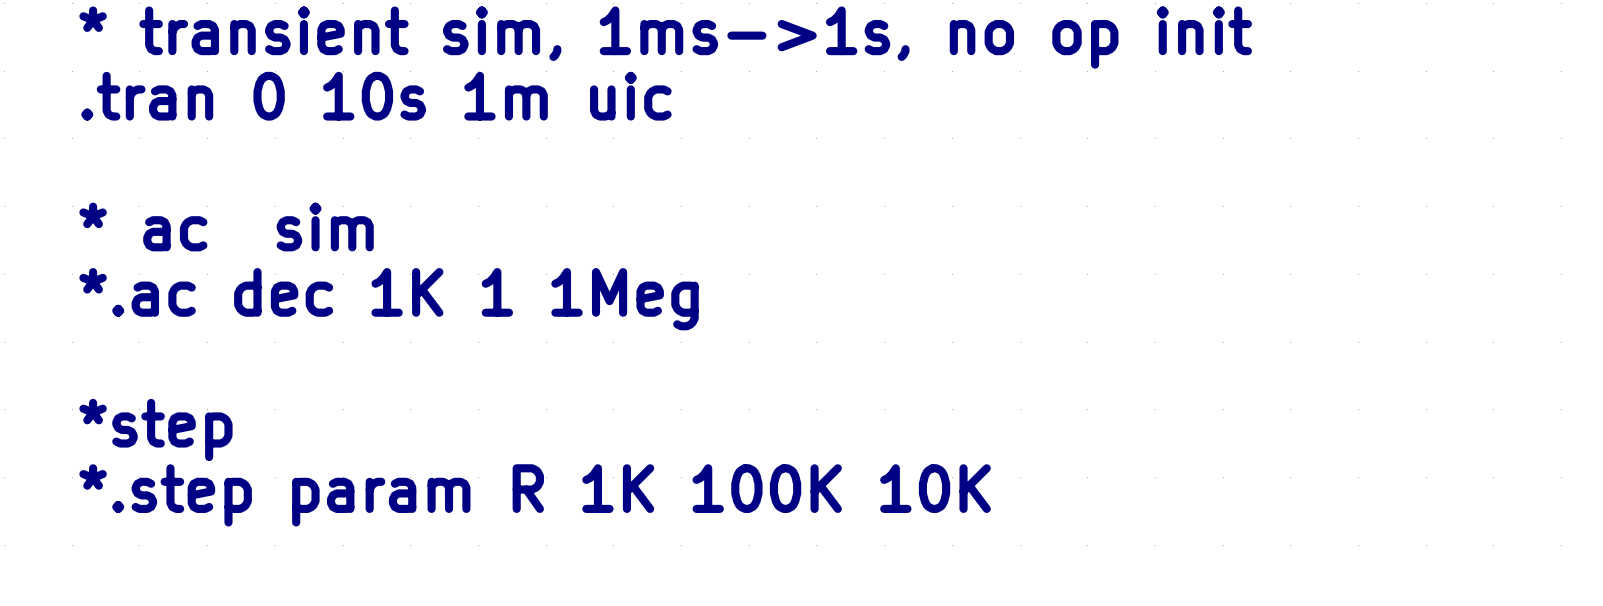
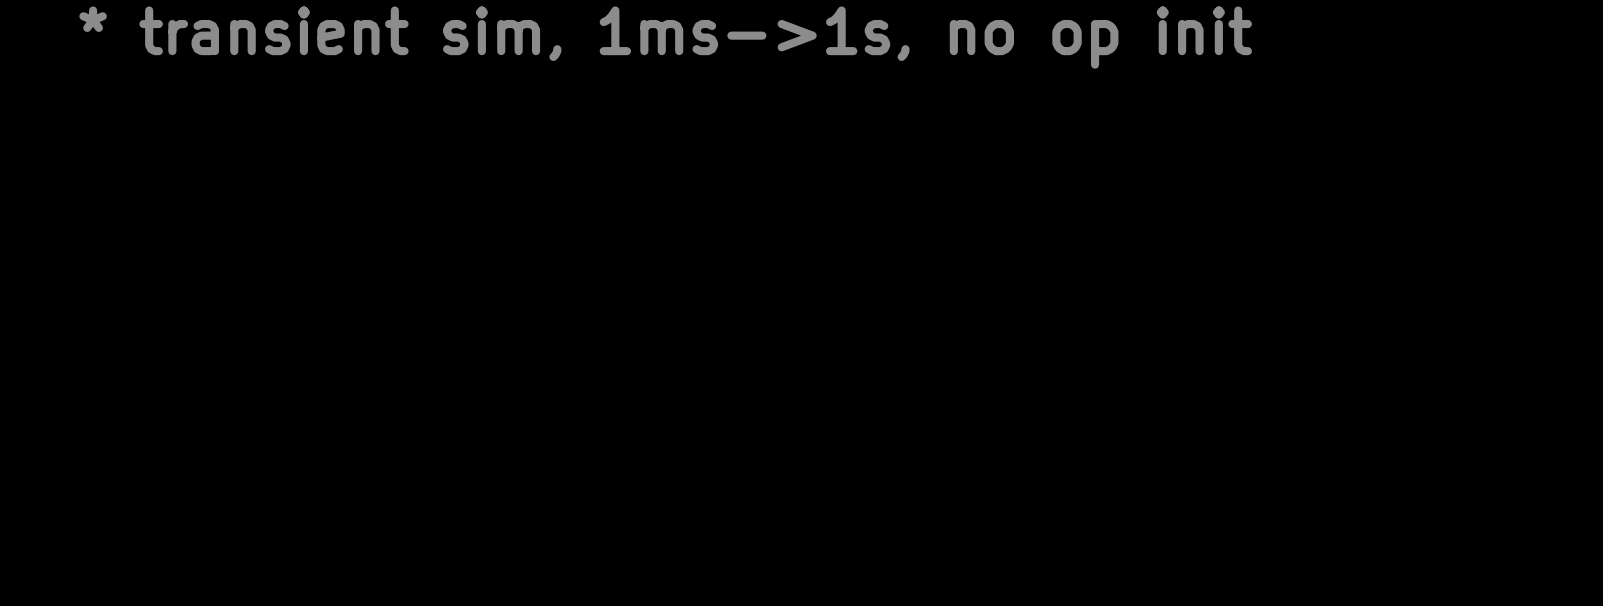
text: .tran 0 10s 1m uic (376, 96) -> none
text: * ac sim (226, 227) -> none
text: *.ac dec 1K 1 1Meg (389, 299) -> none
text: *step (155, 429) -> none
text: *.step param R 1K 100K 10K (535, 495) -> none

